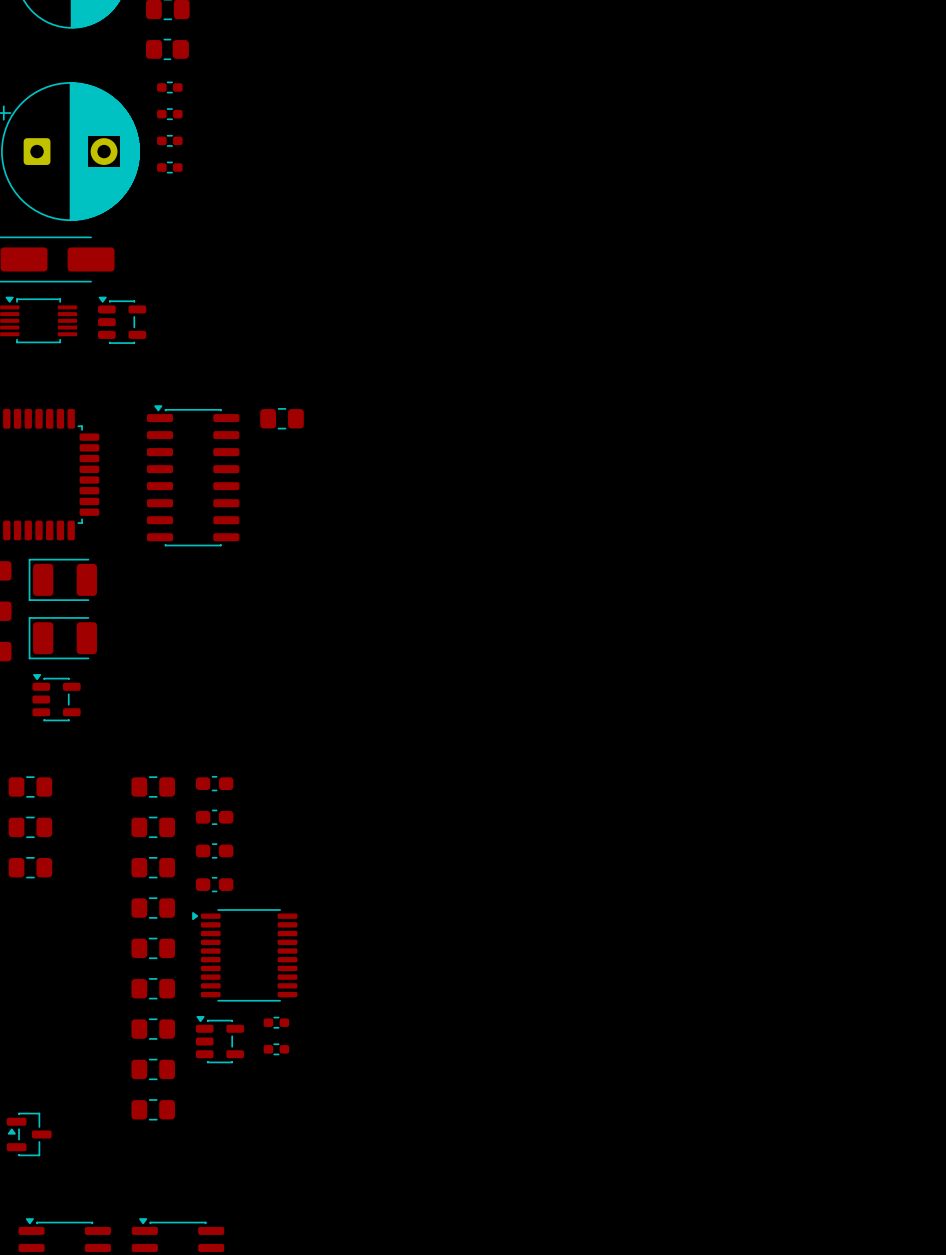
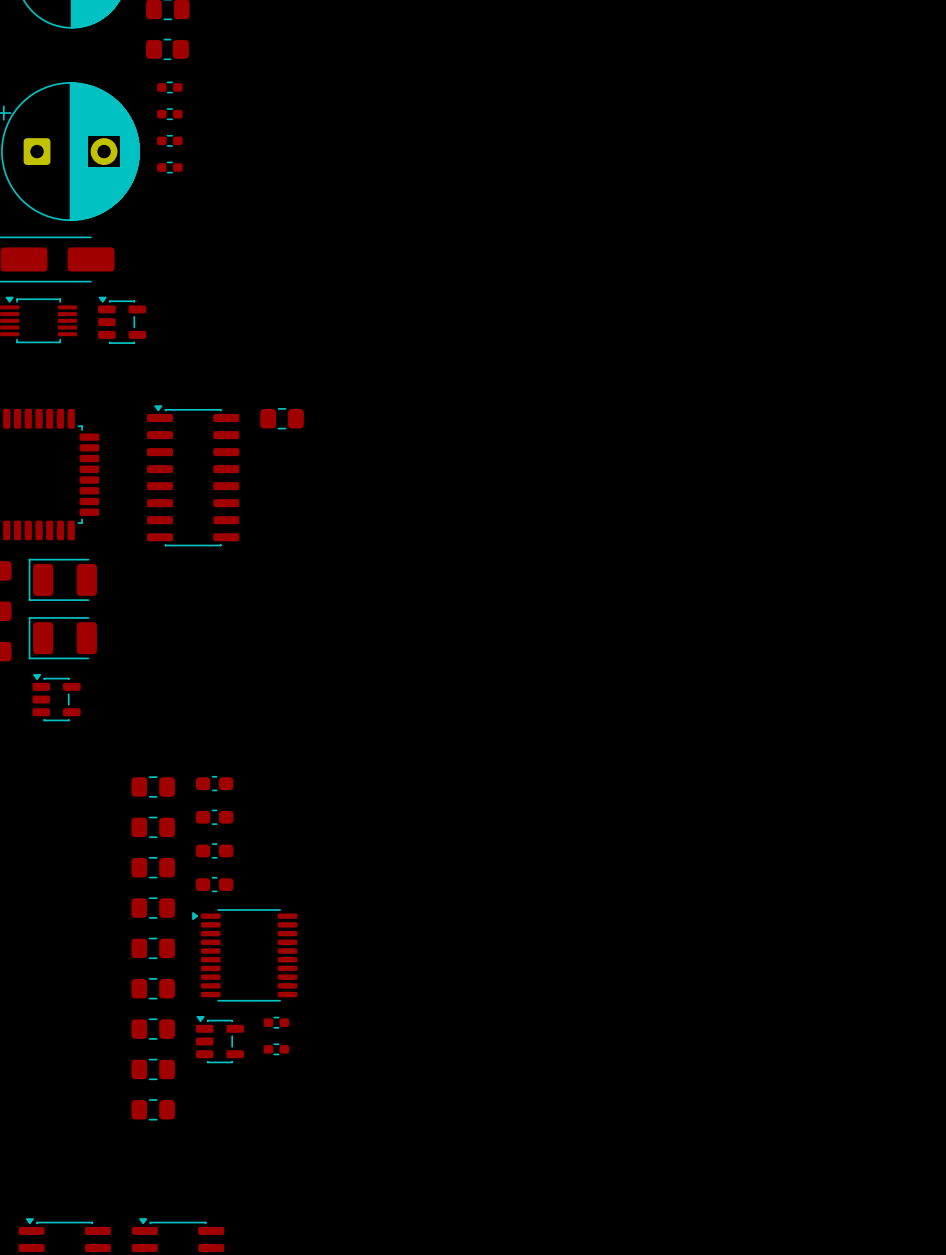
part: (30, 787) -> none
part: (30, 827) -> none
part: (30, 867) -> none
part: (29, 1134) -> none

